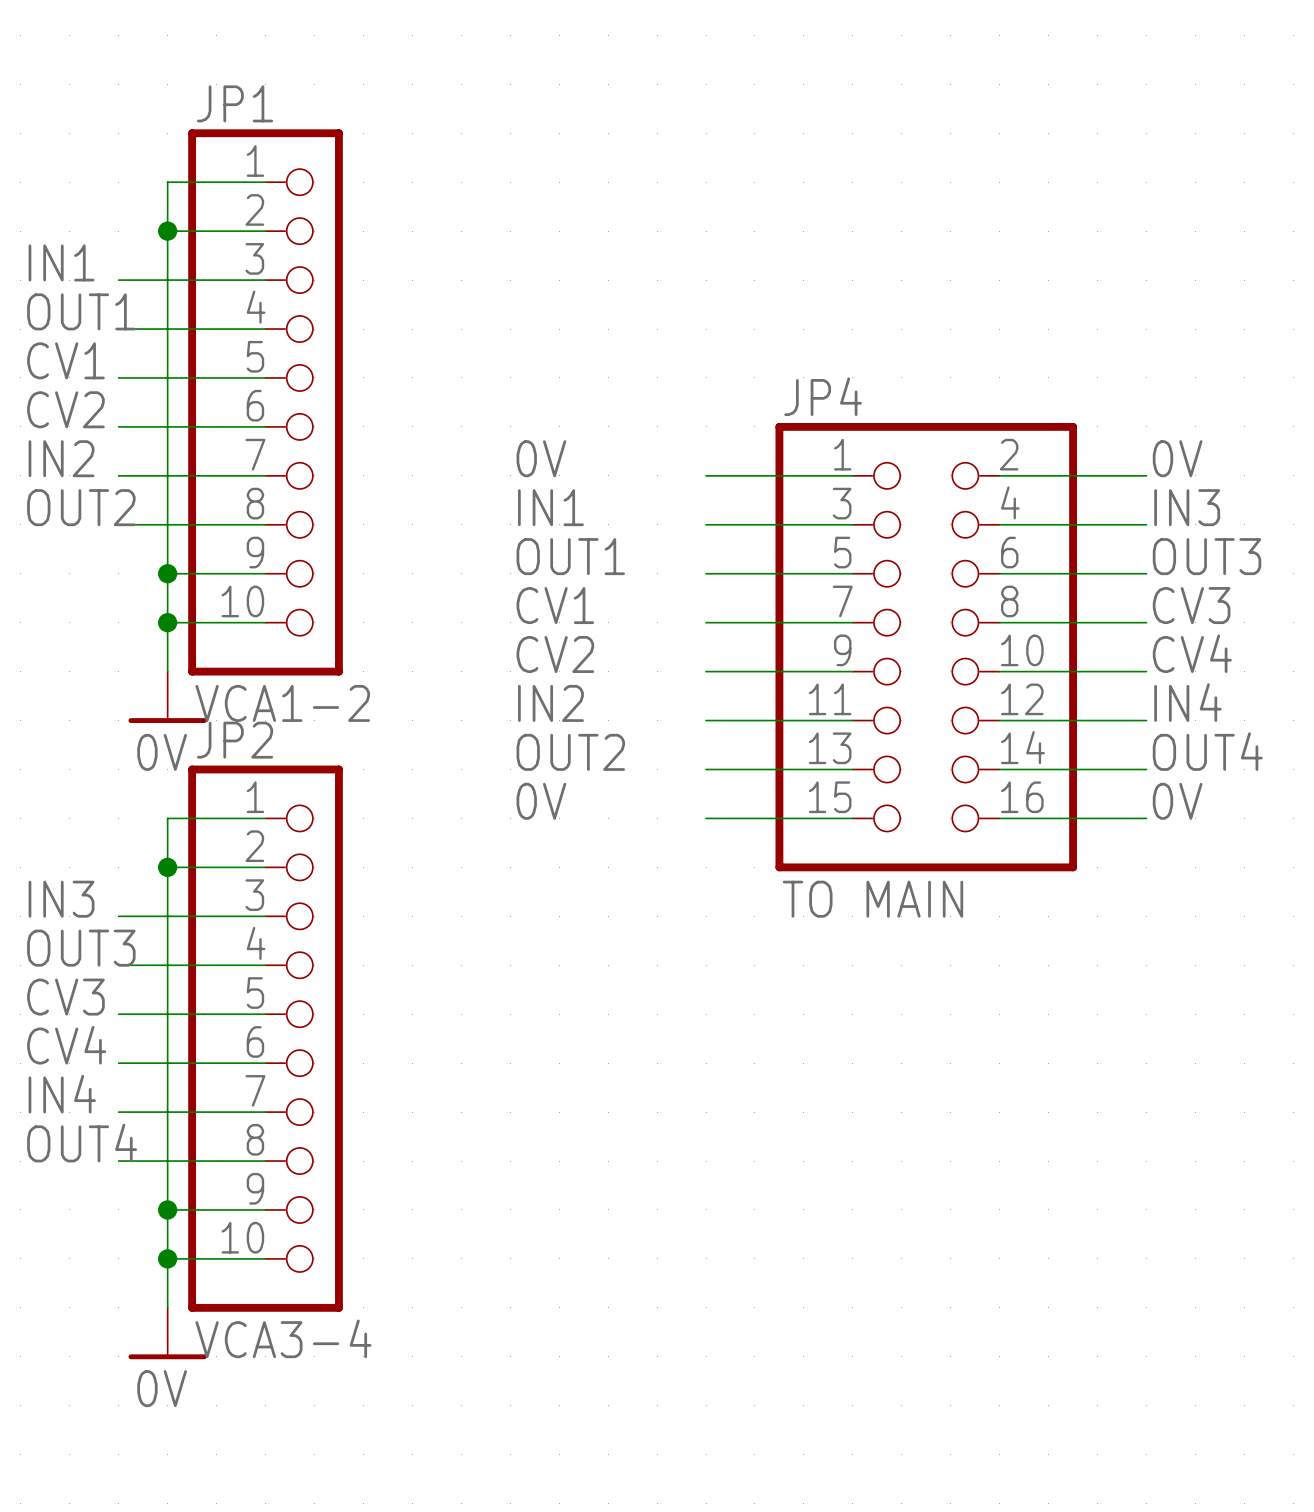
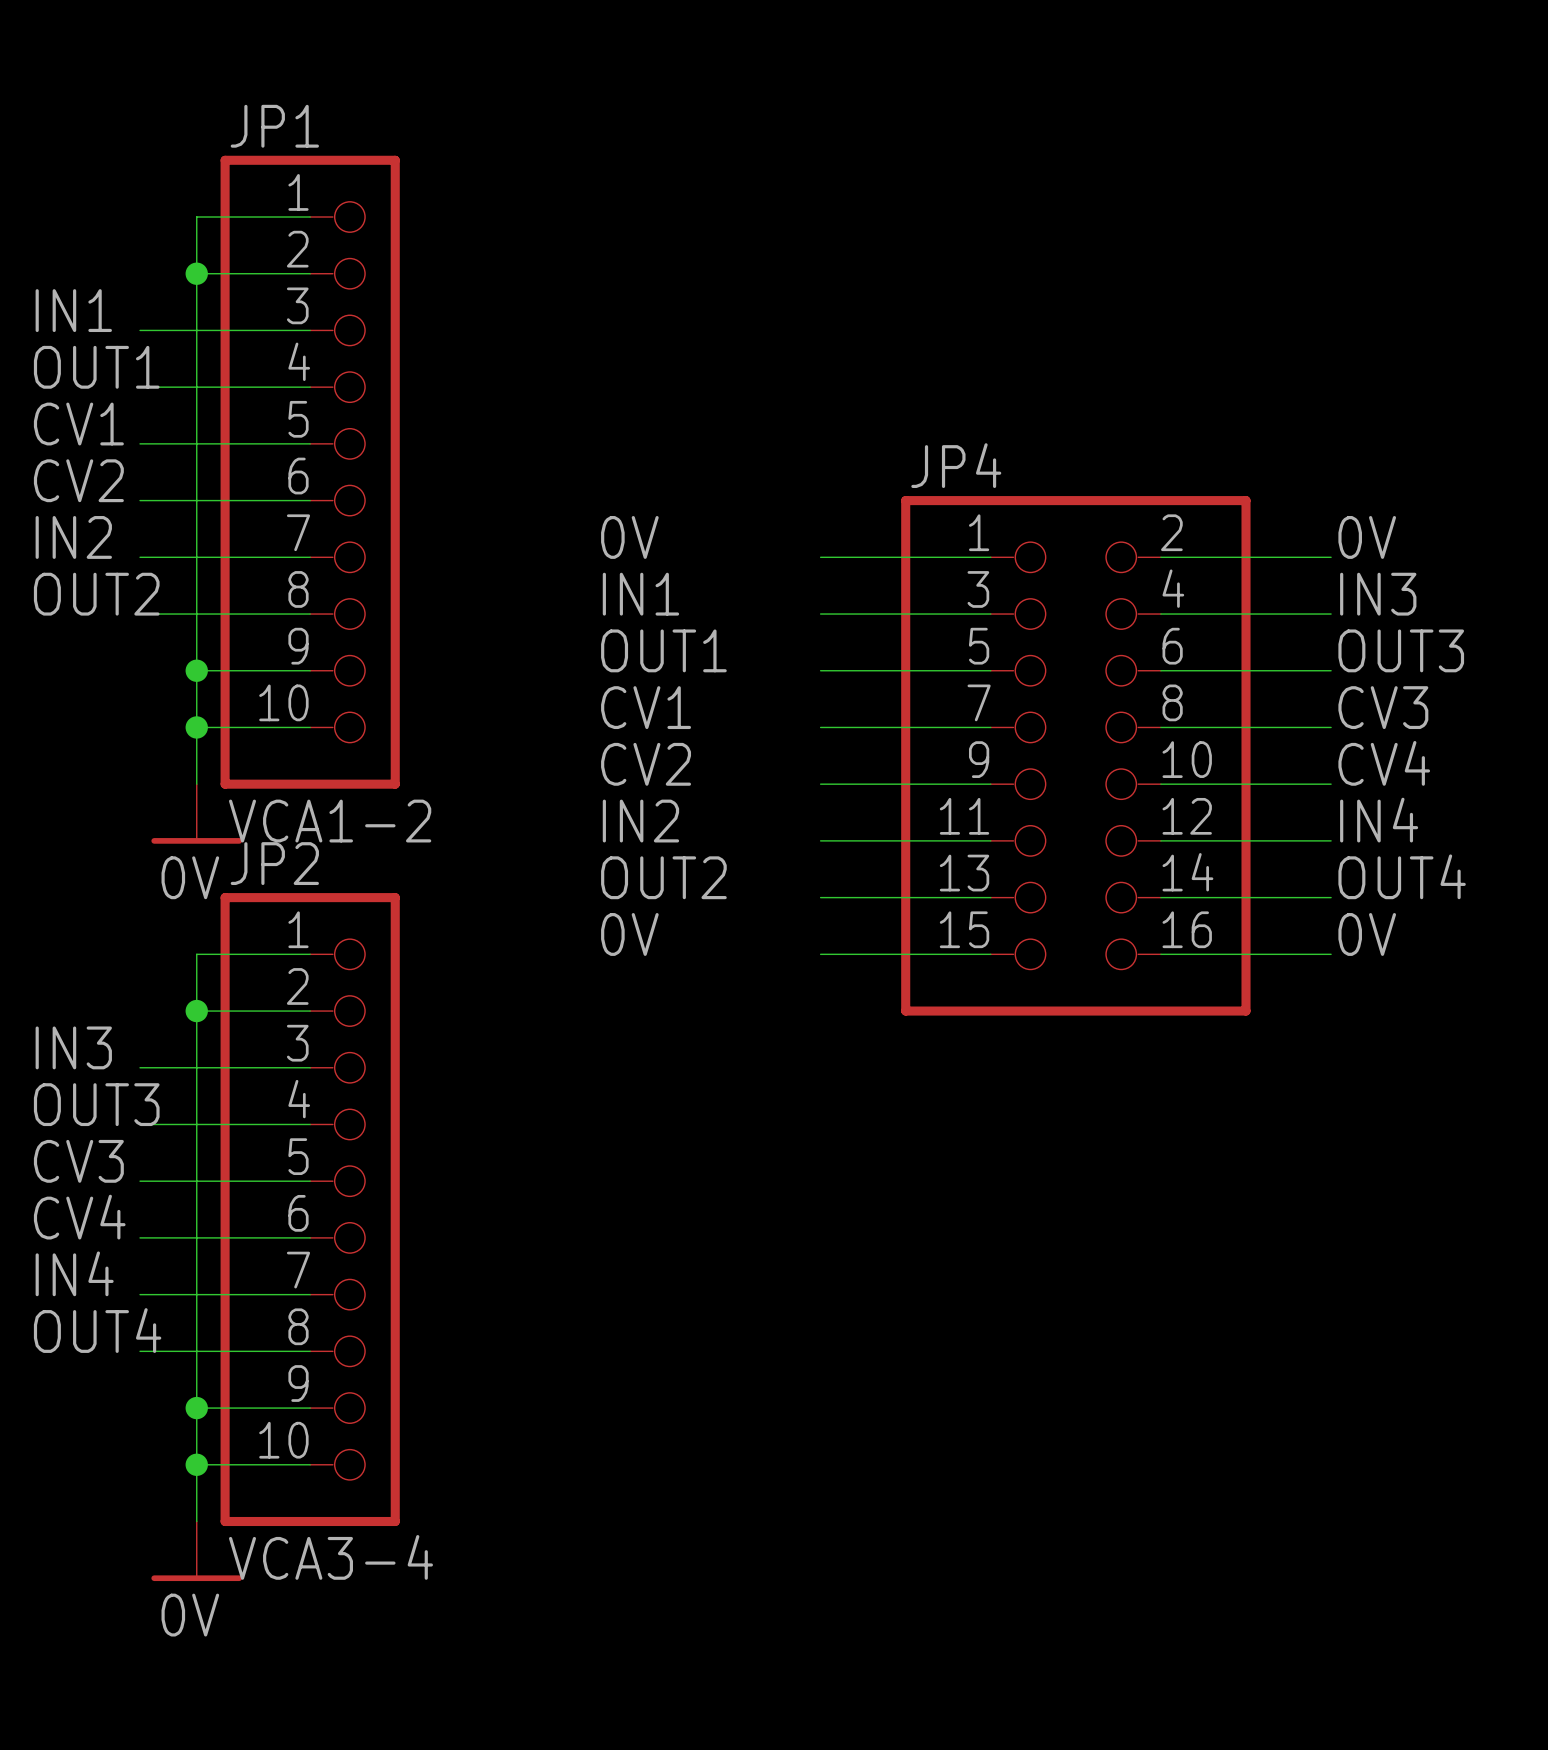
JP4 value: TO MAIN (872, 899) -> none

